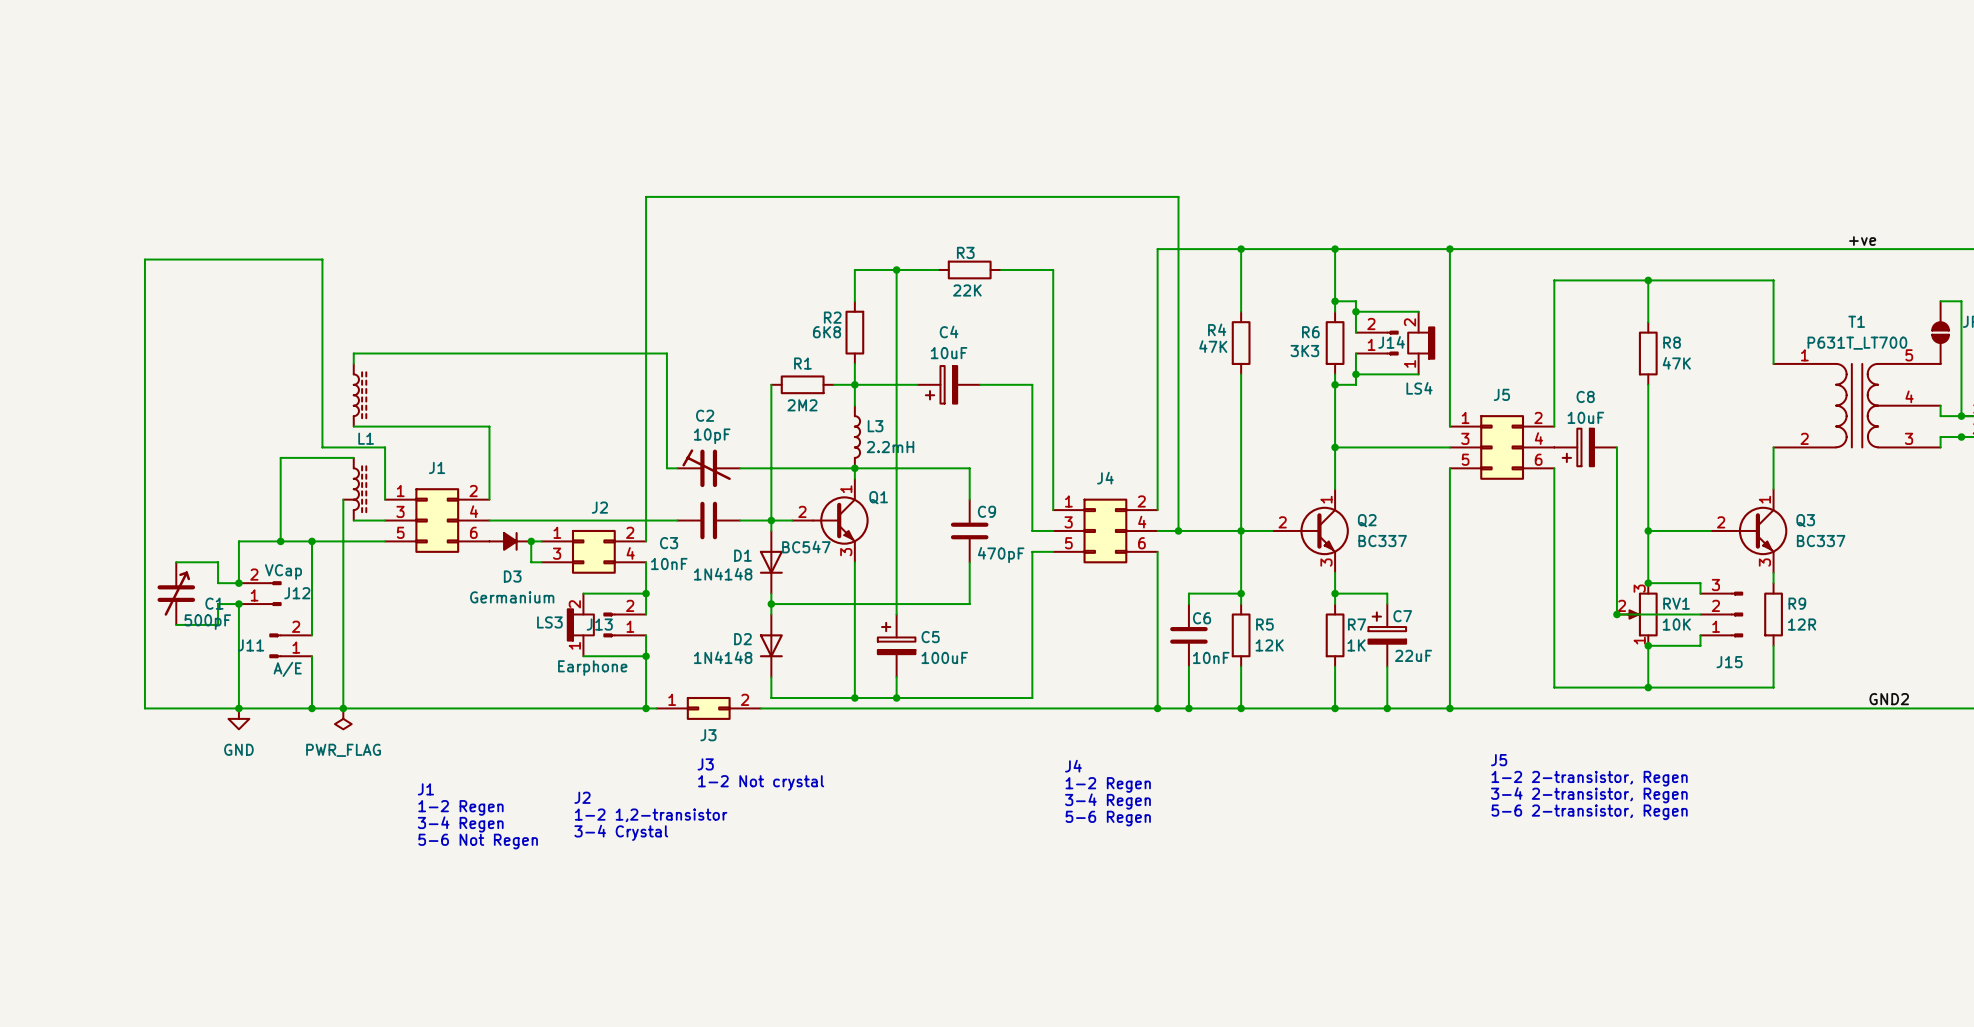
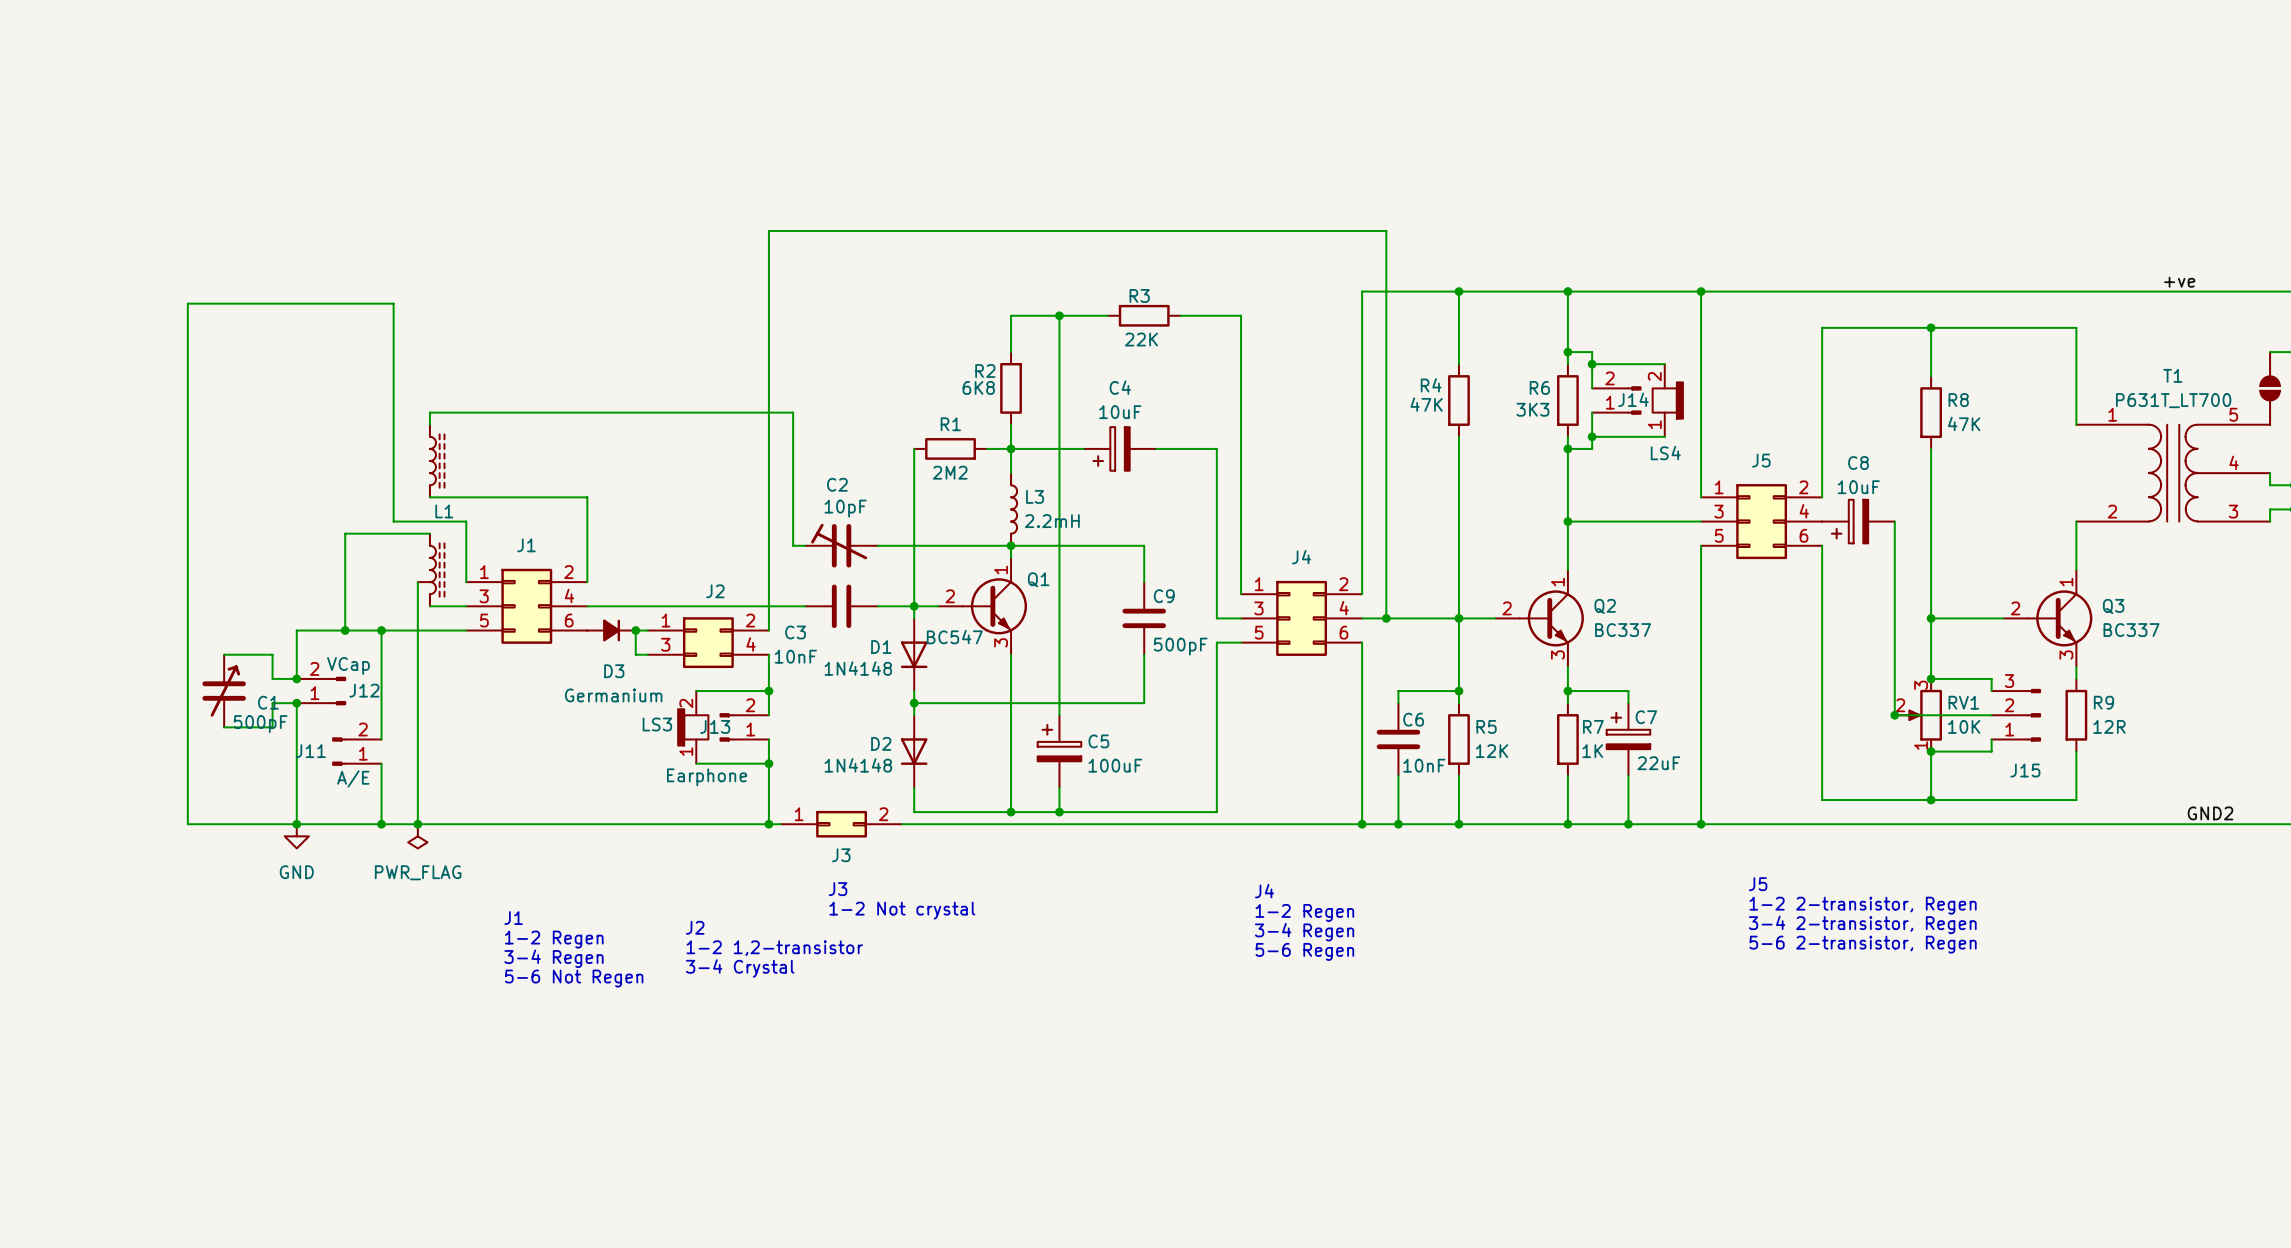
C9 value: 470pF (1001, 555) -> 500pF (1180, 646)

